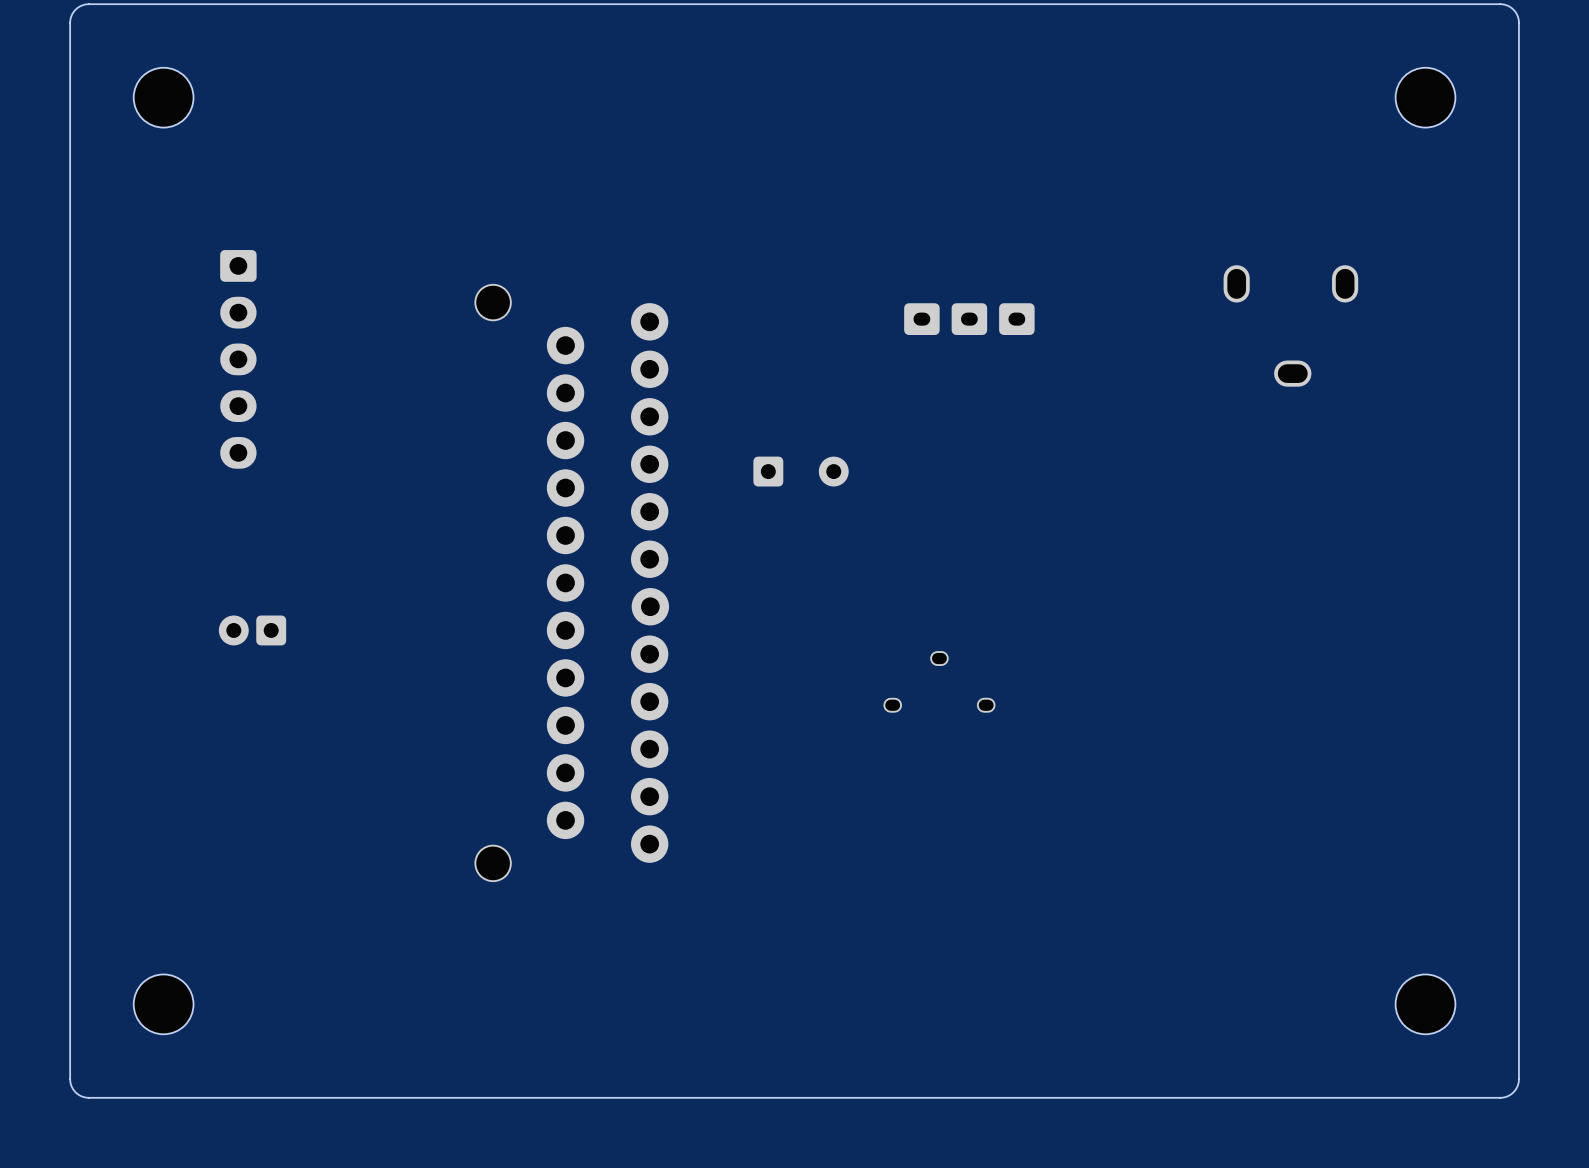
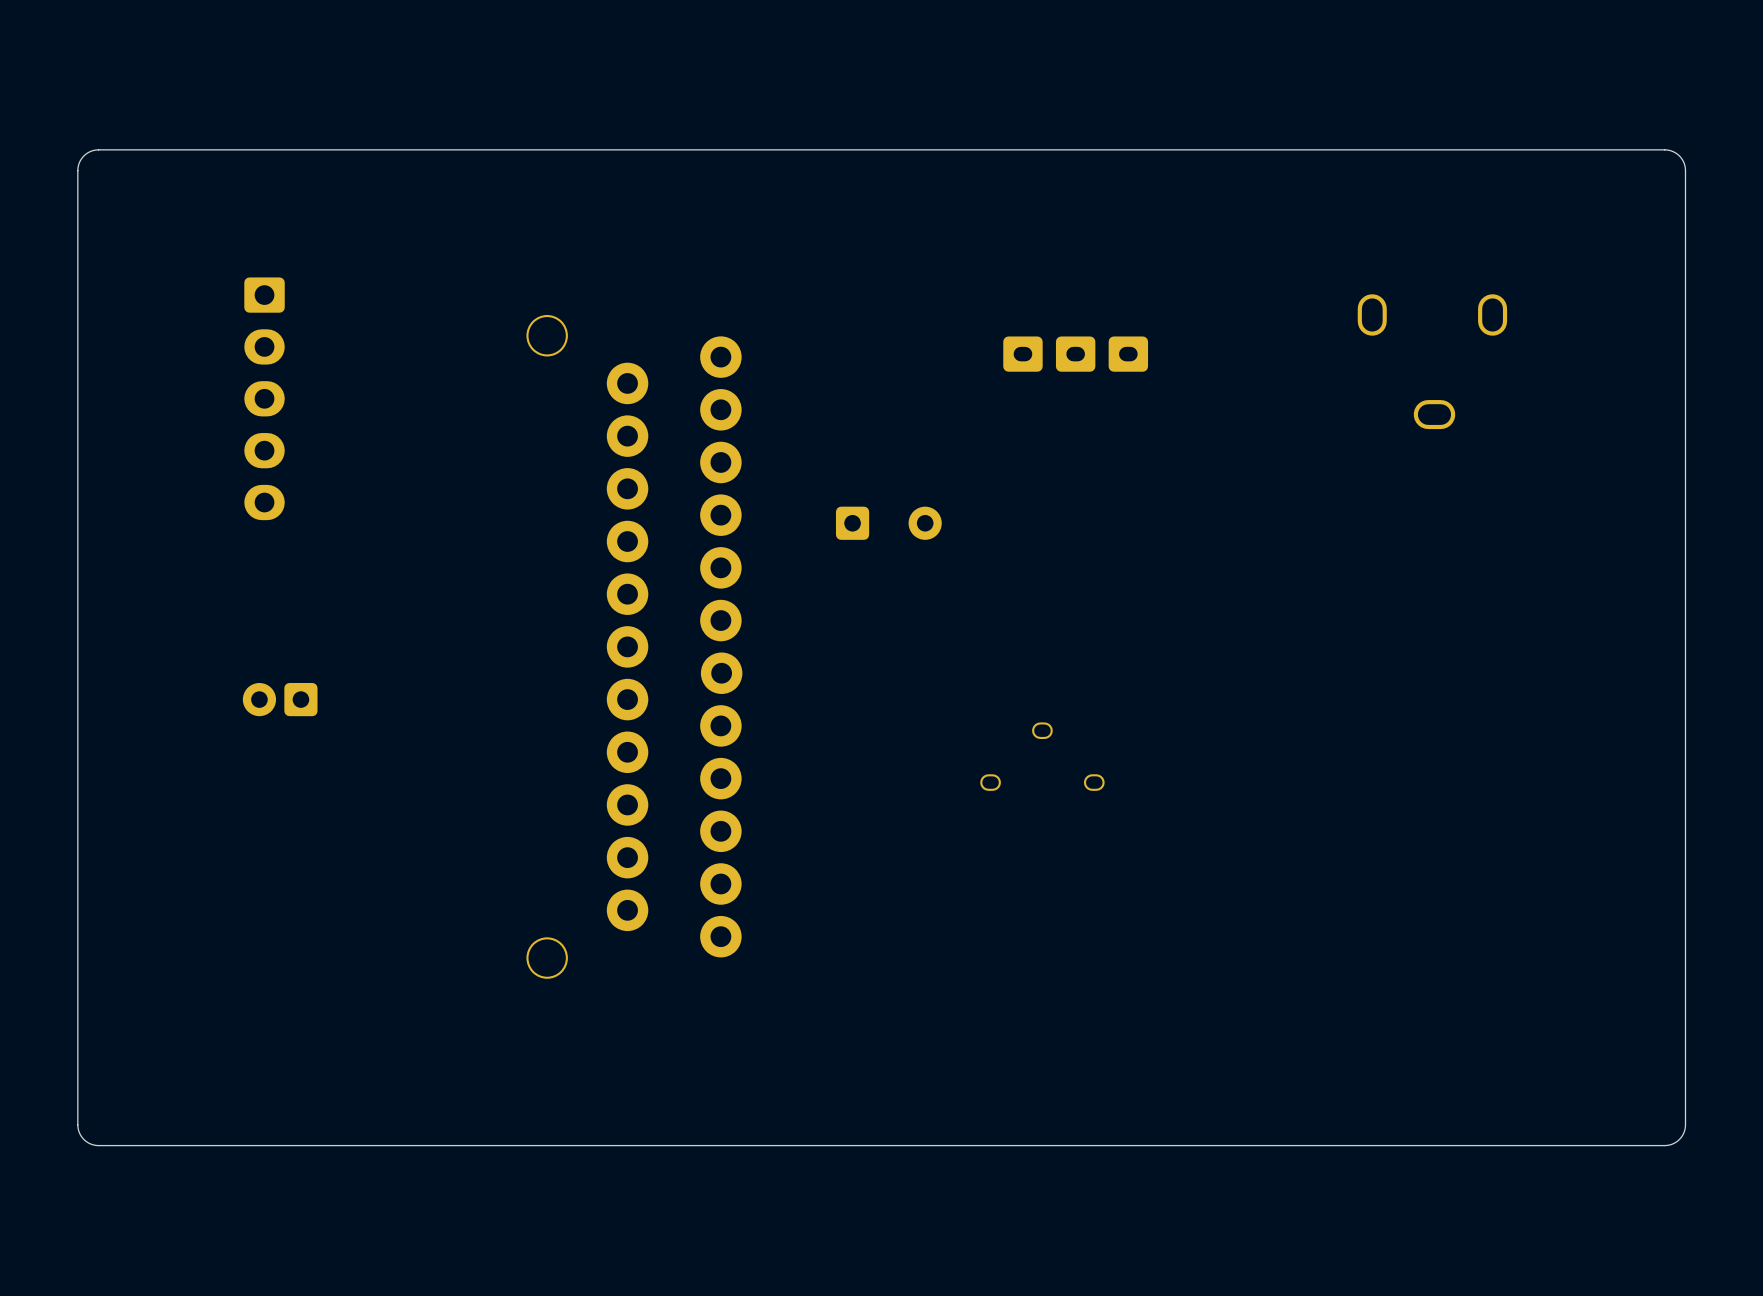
part: (163, 97) -> none
part: (1425, 97) -> none
board edge: (1518, 153) (1518, 20) (1511, 8) (1500, 4) (86, 4) (75, 9) (70, 20) (70, 153) -> (1685, 170) (1684, 163) (1679, 155) (1671, 151) (1664, 149) (98, 149) (91, 151) (83, 155) (78, 163) (77, 170)
part: (163, 1004) -> none
part: (1425, 1004) -> none
board edge: (1518, 1013) (1518, 1083) (1511, 1093) (1500, 1097) (86, 1097) (77, 1093) (70, 1083) (70, 1013) -> (1685, 1124) (1683, 1133) (1679, 1139) (1671, 1144) (1664, 1145) (98, 1145) (91, 1144) (83, 1139) (79, 1133) (77, 1124)

